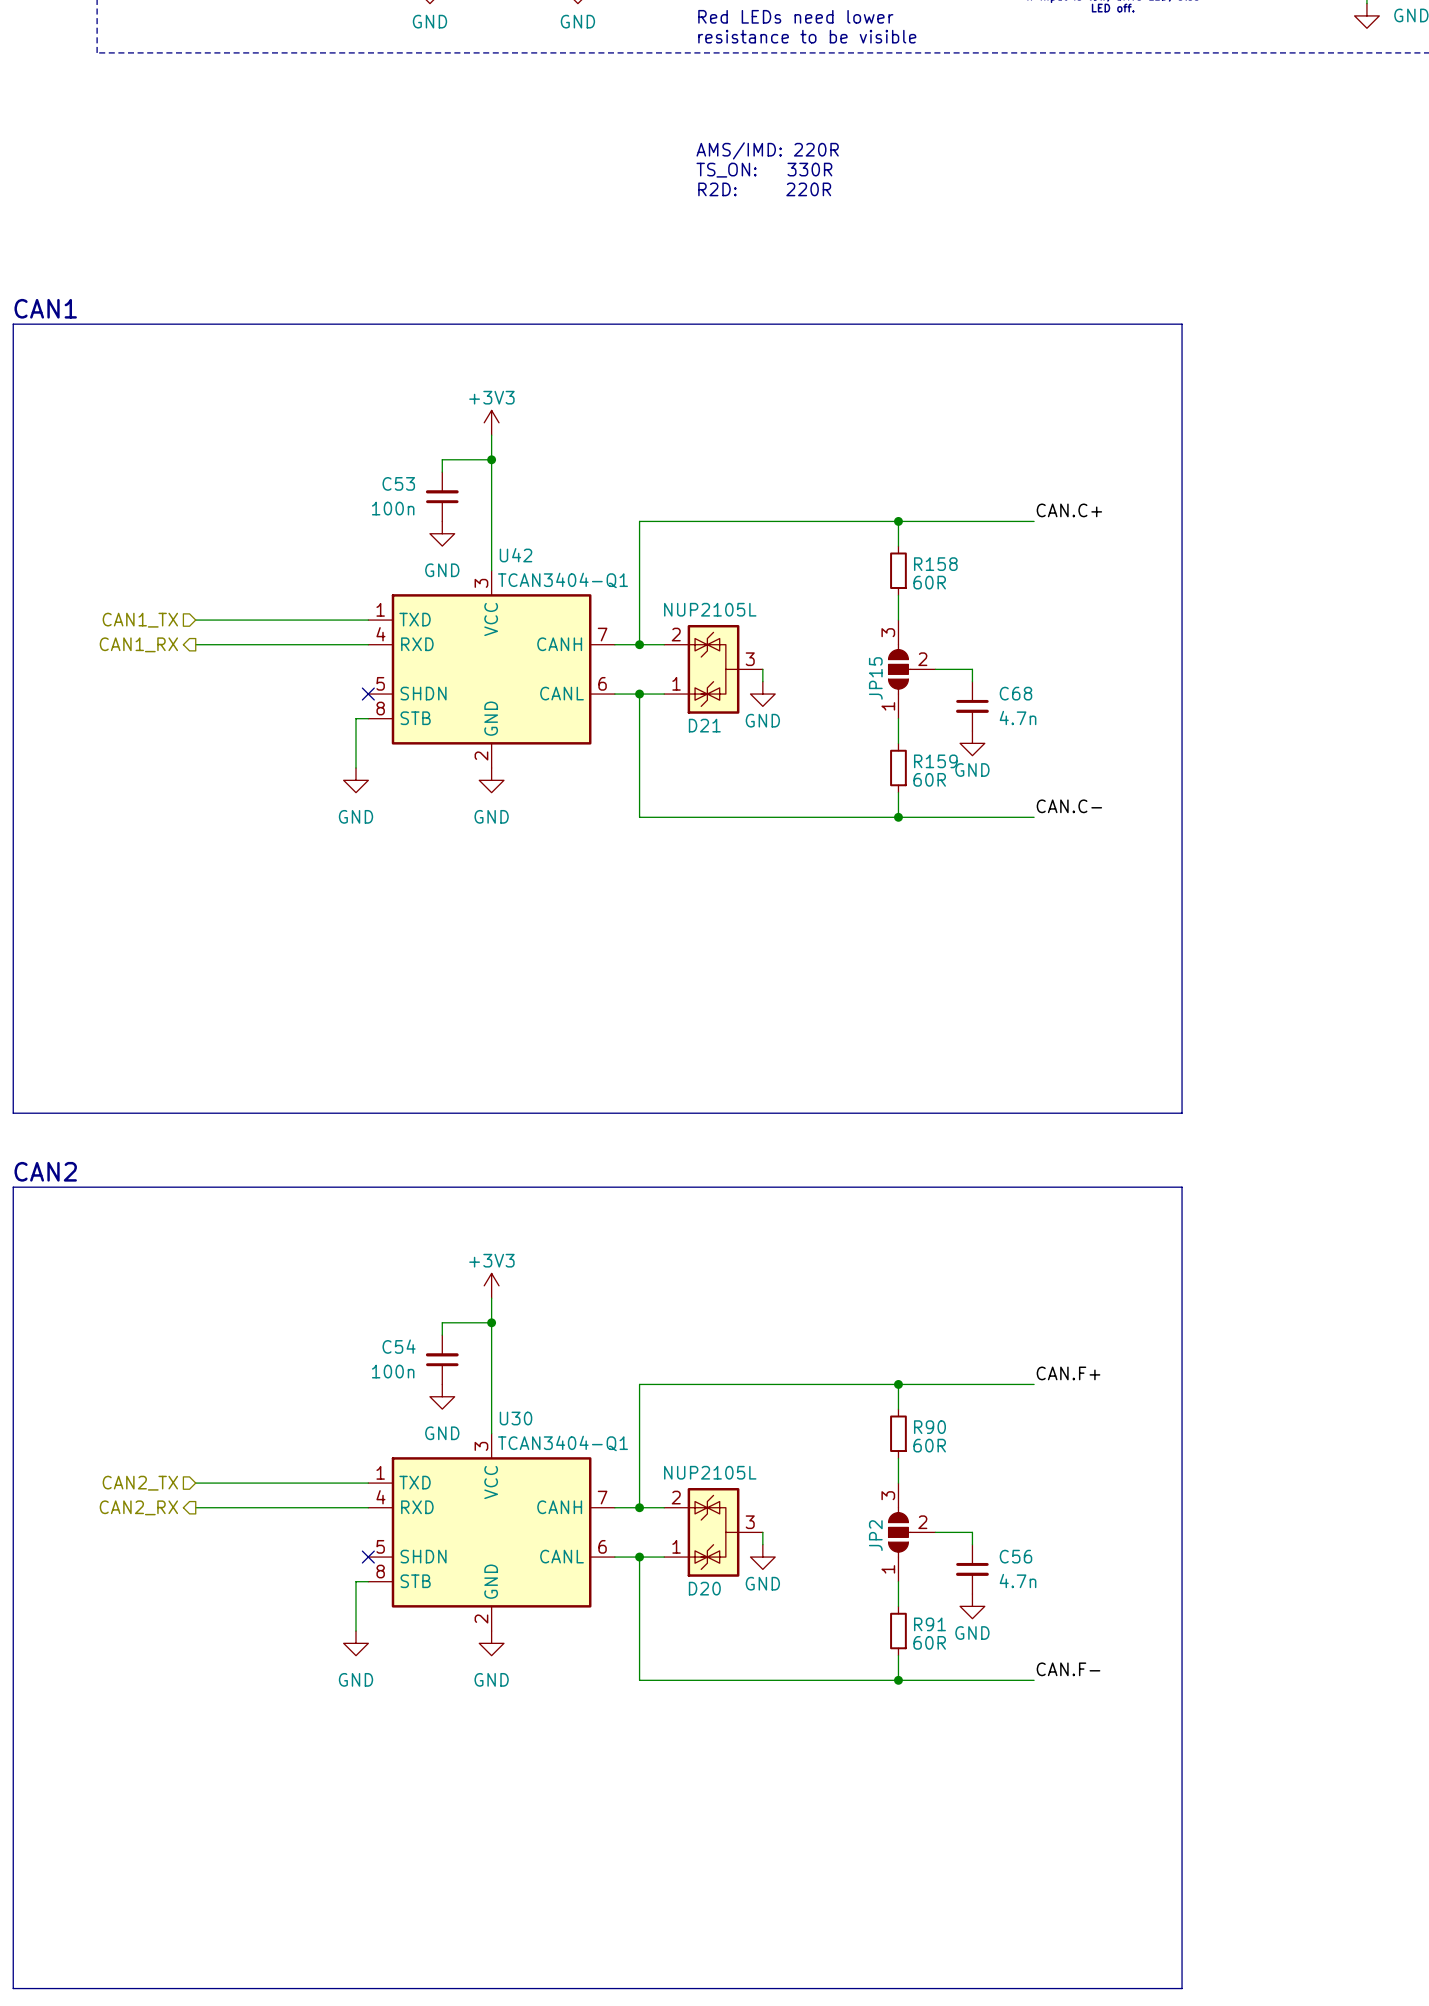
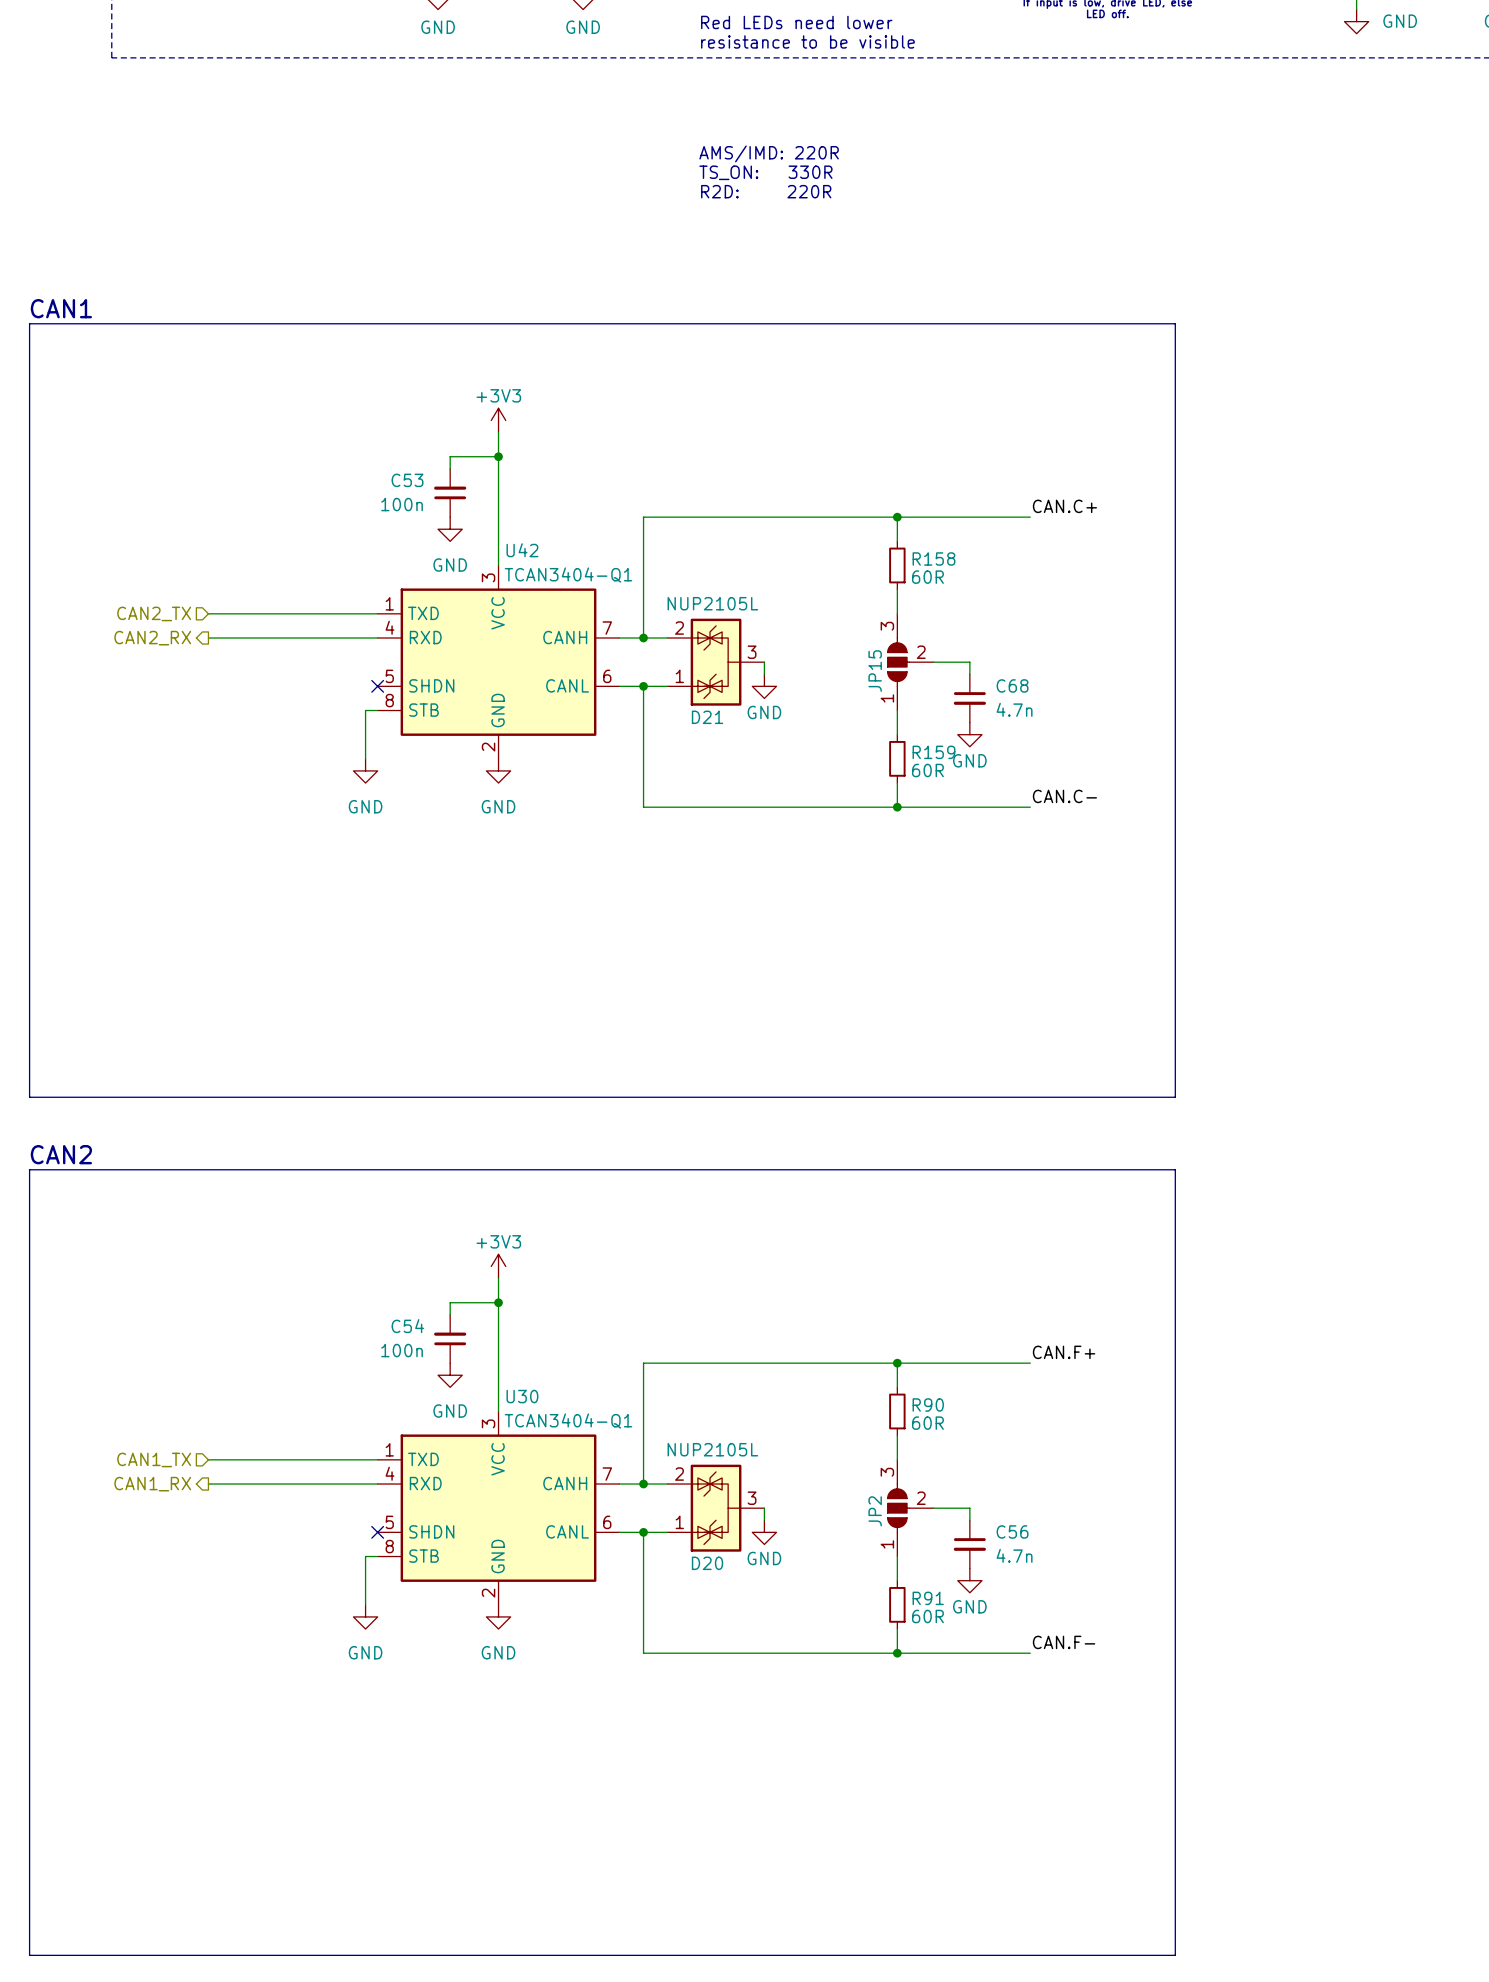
hierarchical label: CAN1_TX (140, 620) -> CAN2_TX (154, 613)
hierarchical label: CAN1_RX (138, 644) -> CAN2_RX (152, 638)
hierarchical label: CAN2_TX (140, 1483) -> CAN1_TX (154, 1459)
hierarchical label: CAN2_RX (138, 1507) -> CAN1_RX (152, 1484)

